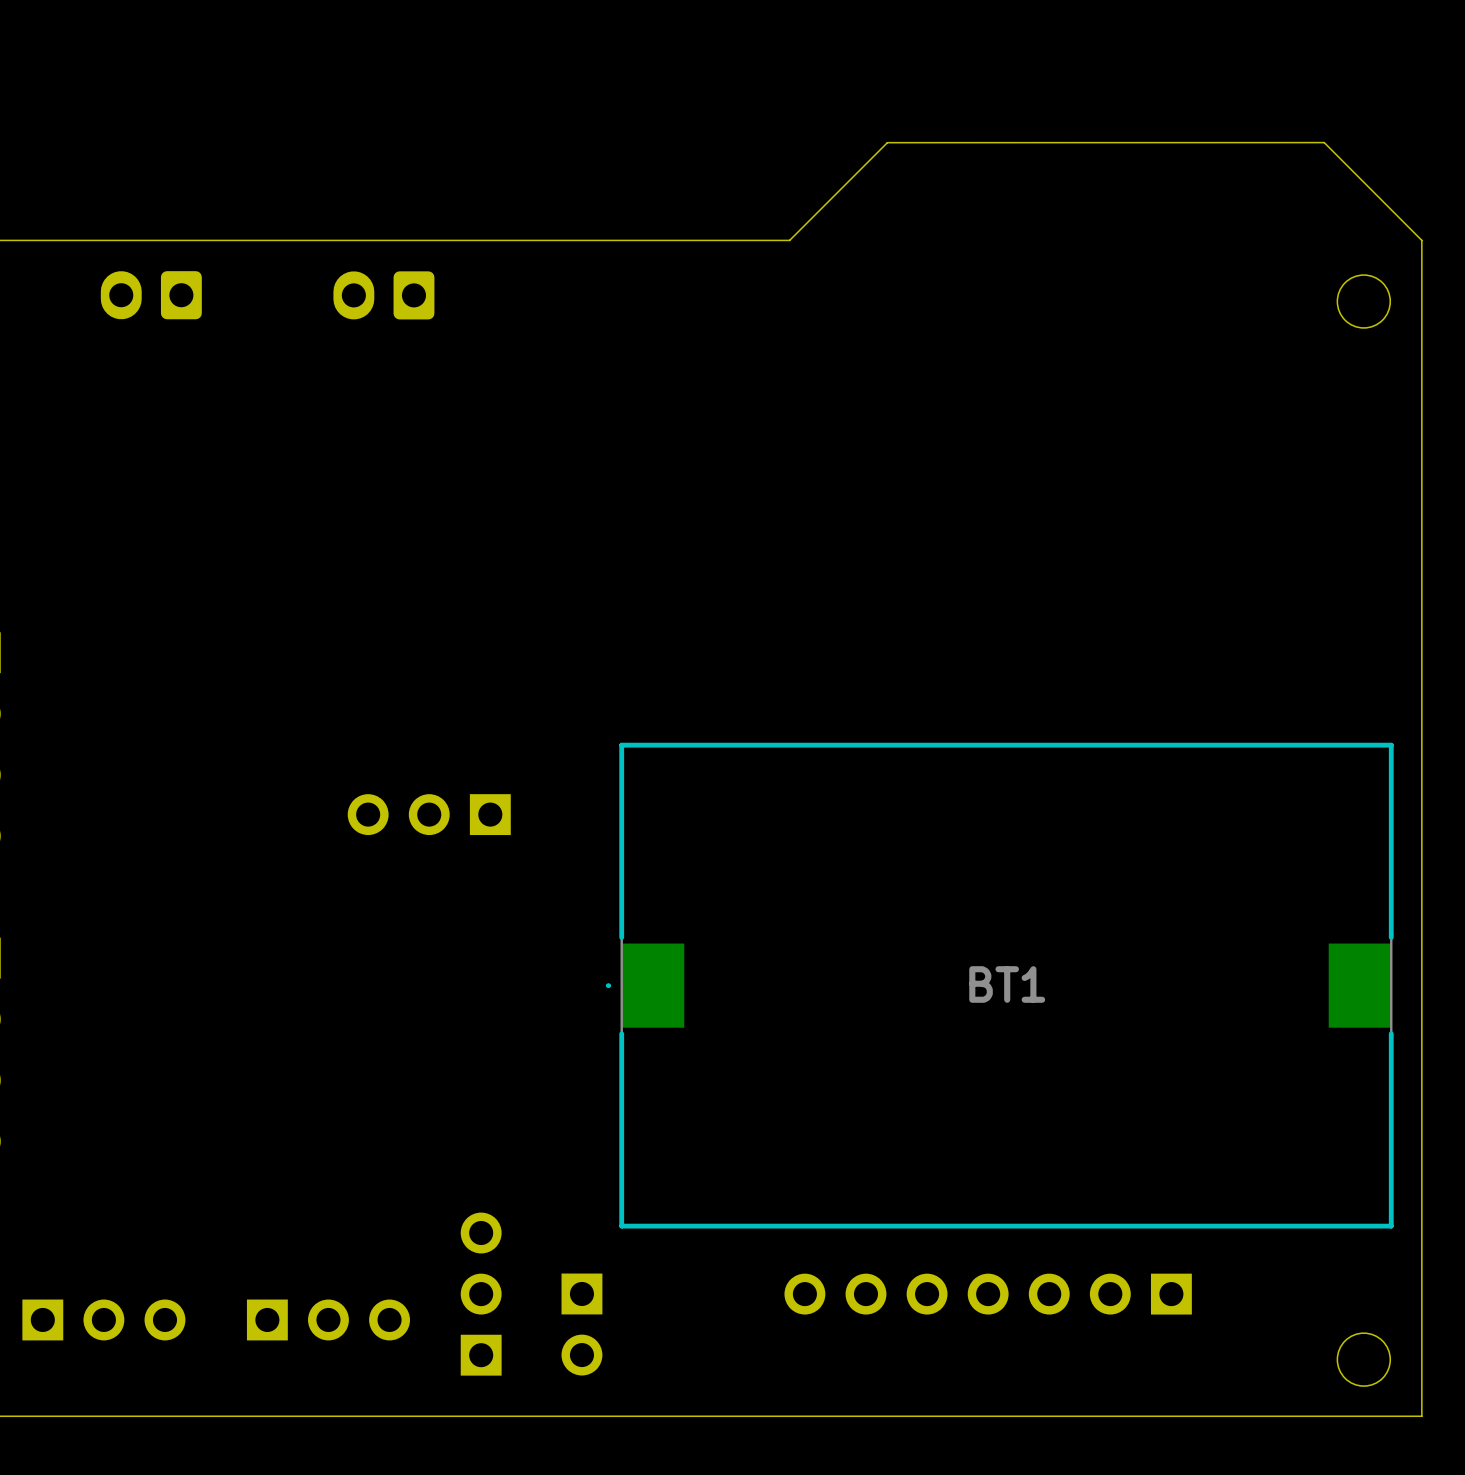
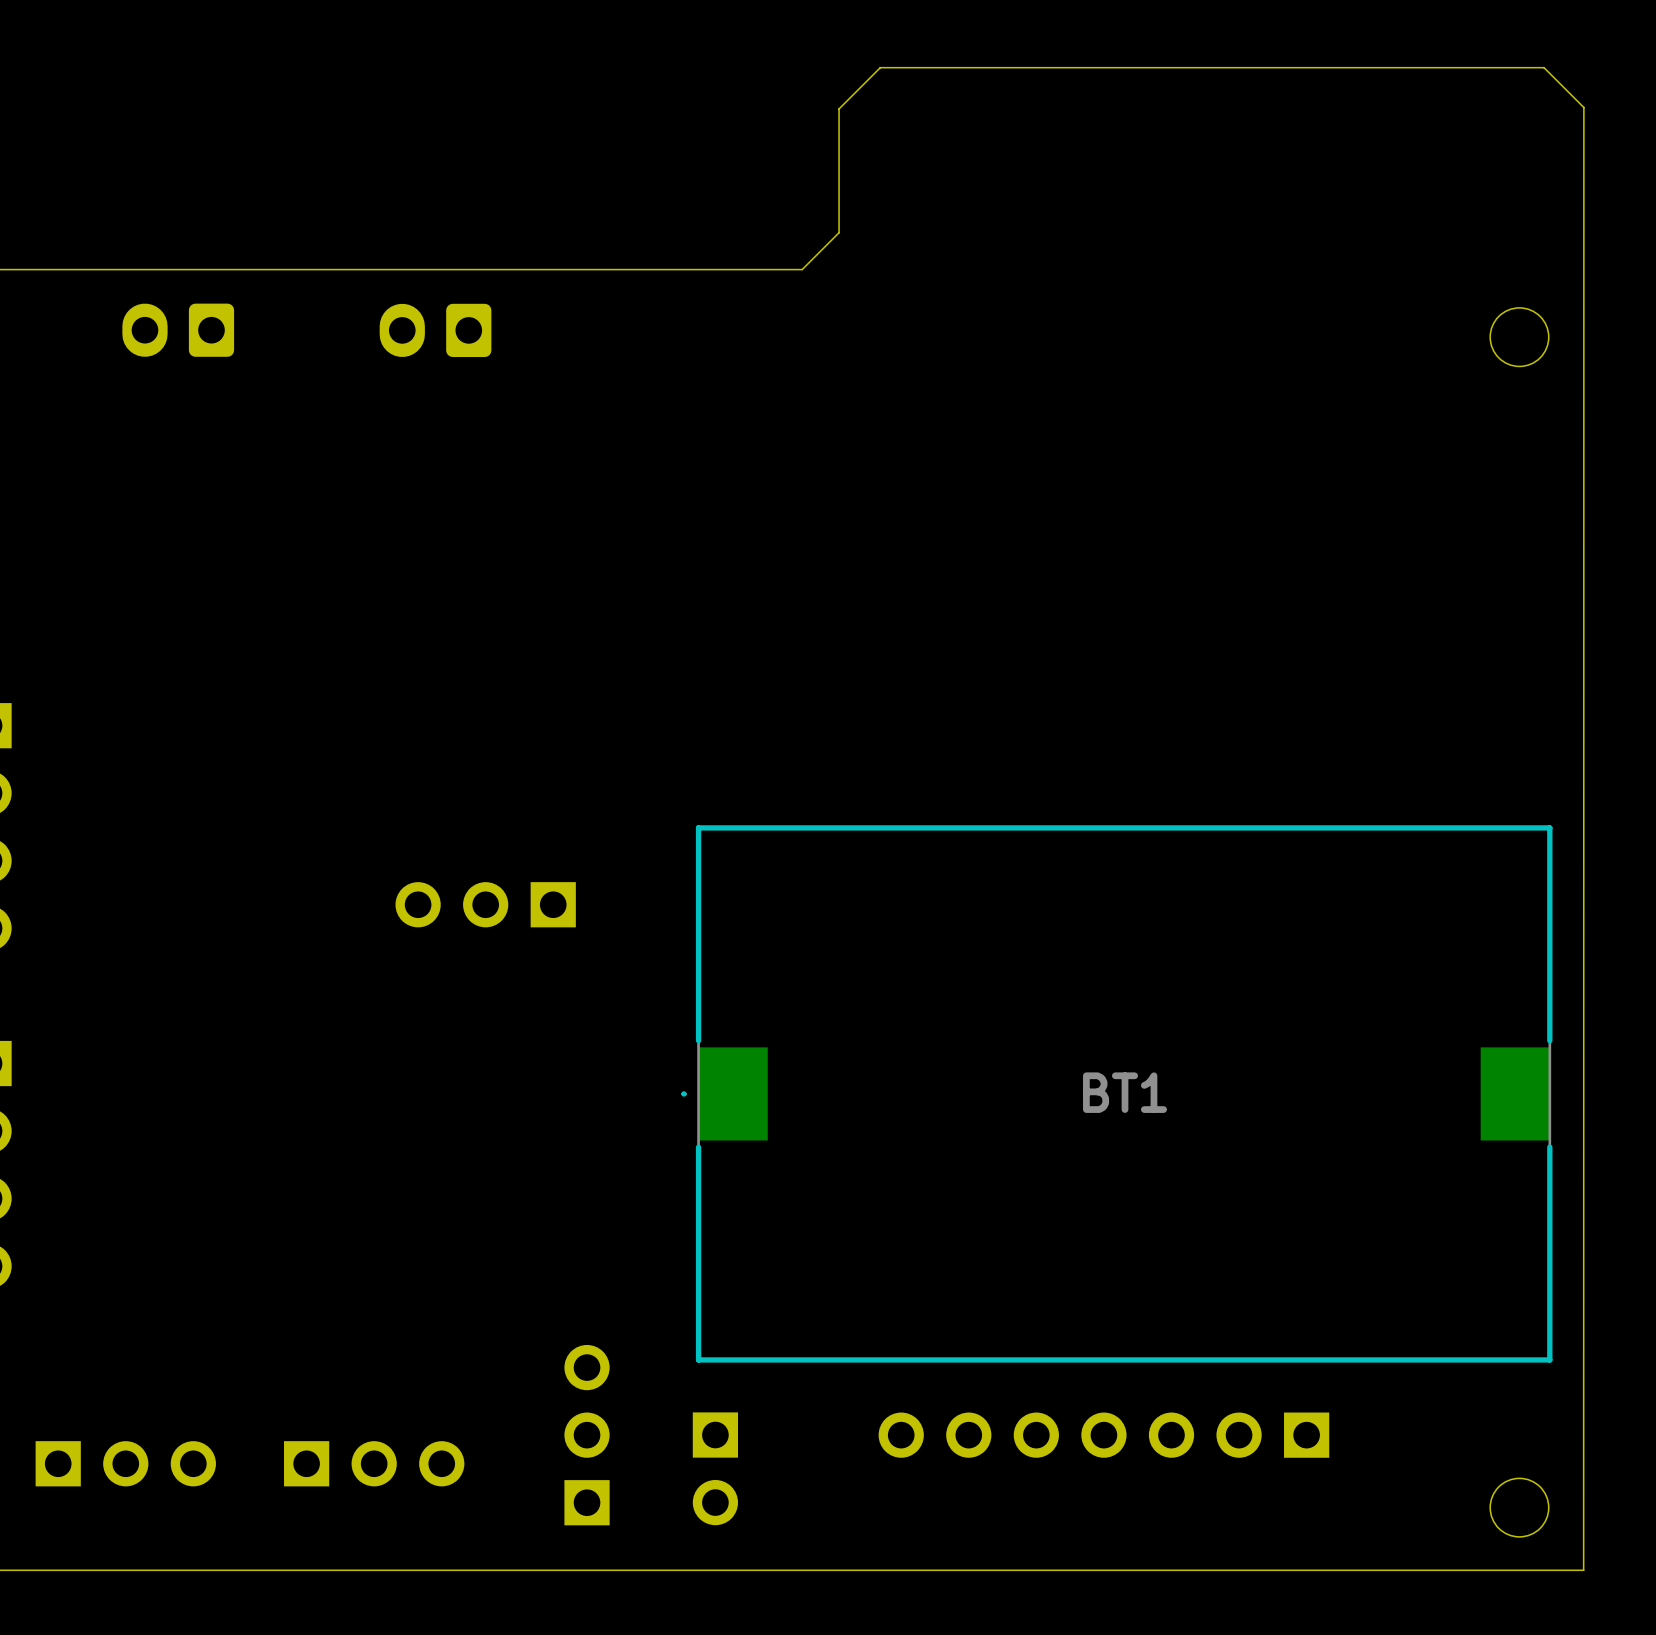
board edge: (715, 240) (789, 240) (887, 142) (1324, 142) (1421, 240) (1421, 1416) -> (802, 269) (839, 232) (839, 108) (880, 67) (1544, 67) (1583, 107) (1583, 1570)
part position: (481, 1294) -> (587, 1435)
part position: (581, 1324) -> (715, 1468)

